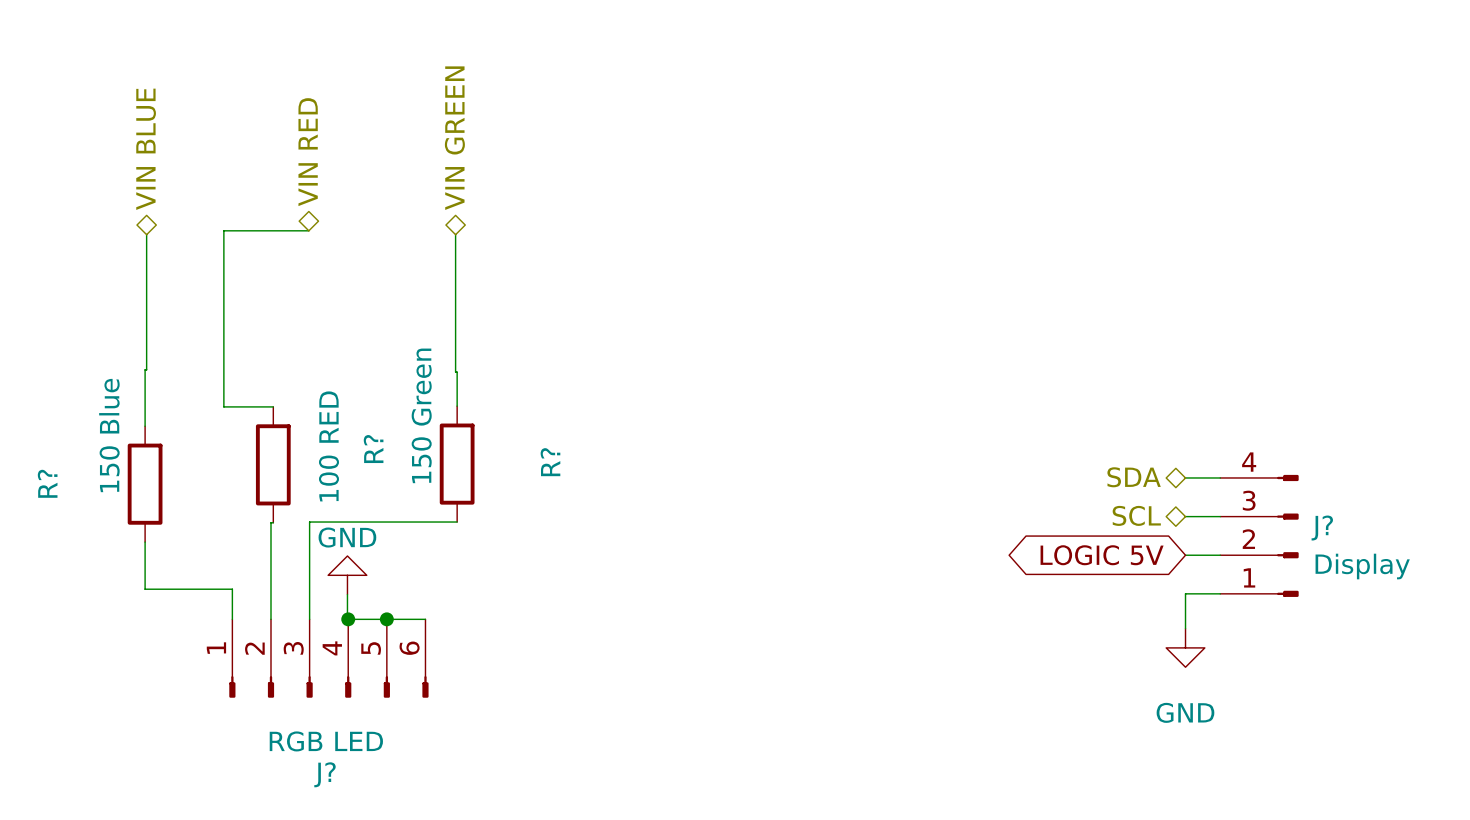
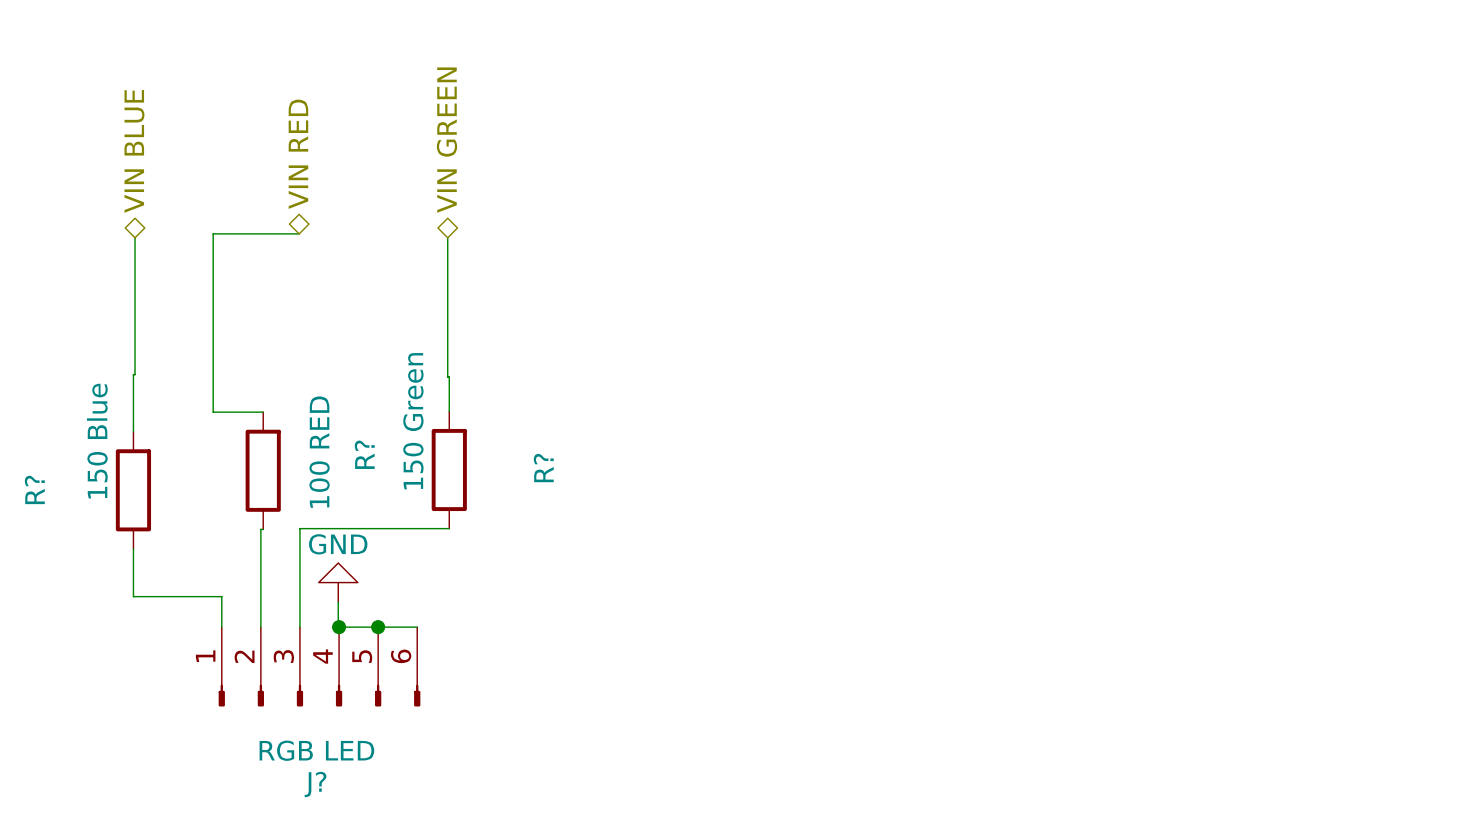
hierarchical label: SDA (1134, 477) -> none
wire: (1185, 477) (1220, 477) -> none
hierarchical label: SCL (1136, 515) -> none
wire: (1185, 516) (1220, 516) -> none
J?: Display (1259, 535) -> none
global label: LOGIC 5V (1102, 555) -> none
wire: (1185, 555) (1220, 555) -> none
wire: (1220, 593) (1185, 593) (1185, 628) -> none
power symbol: GND (1185, 647) -> none

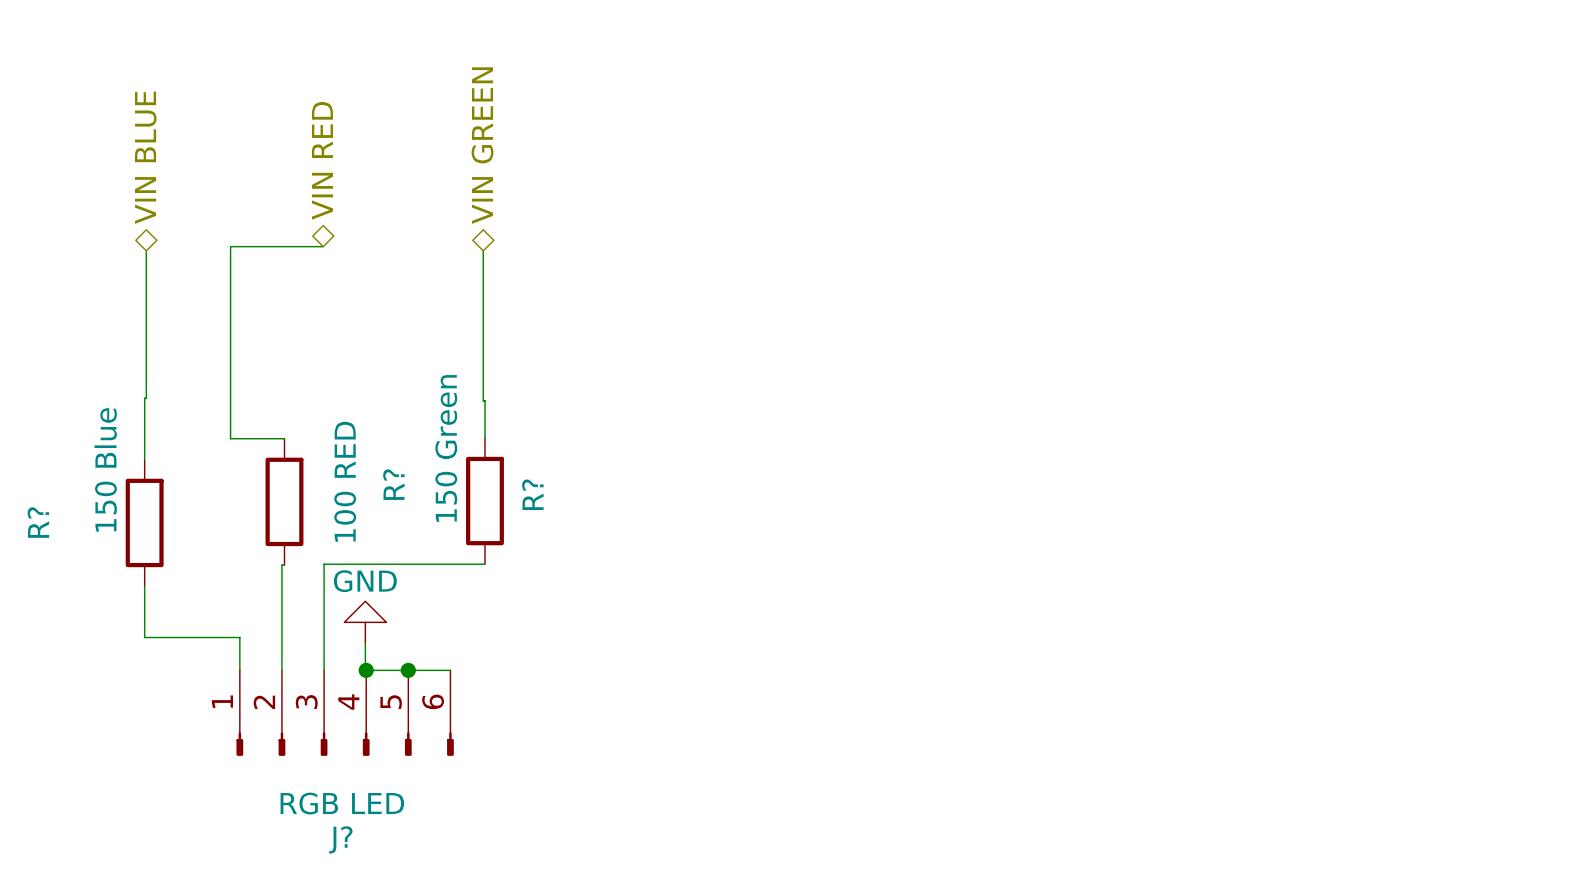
R? name position: R? (543, 468) -> R? (532, 494)

